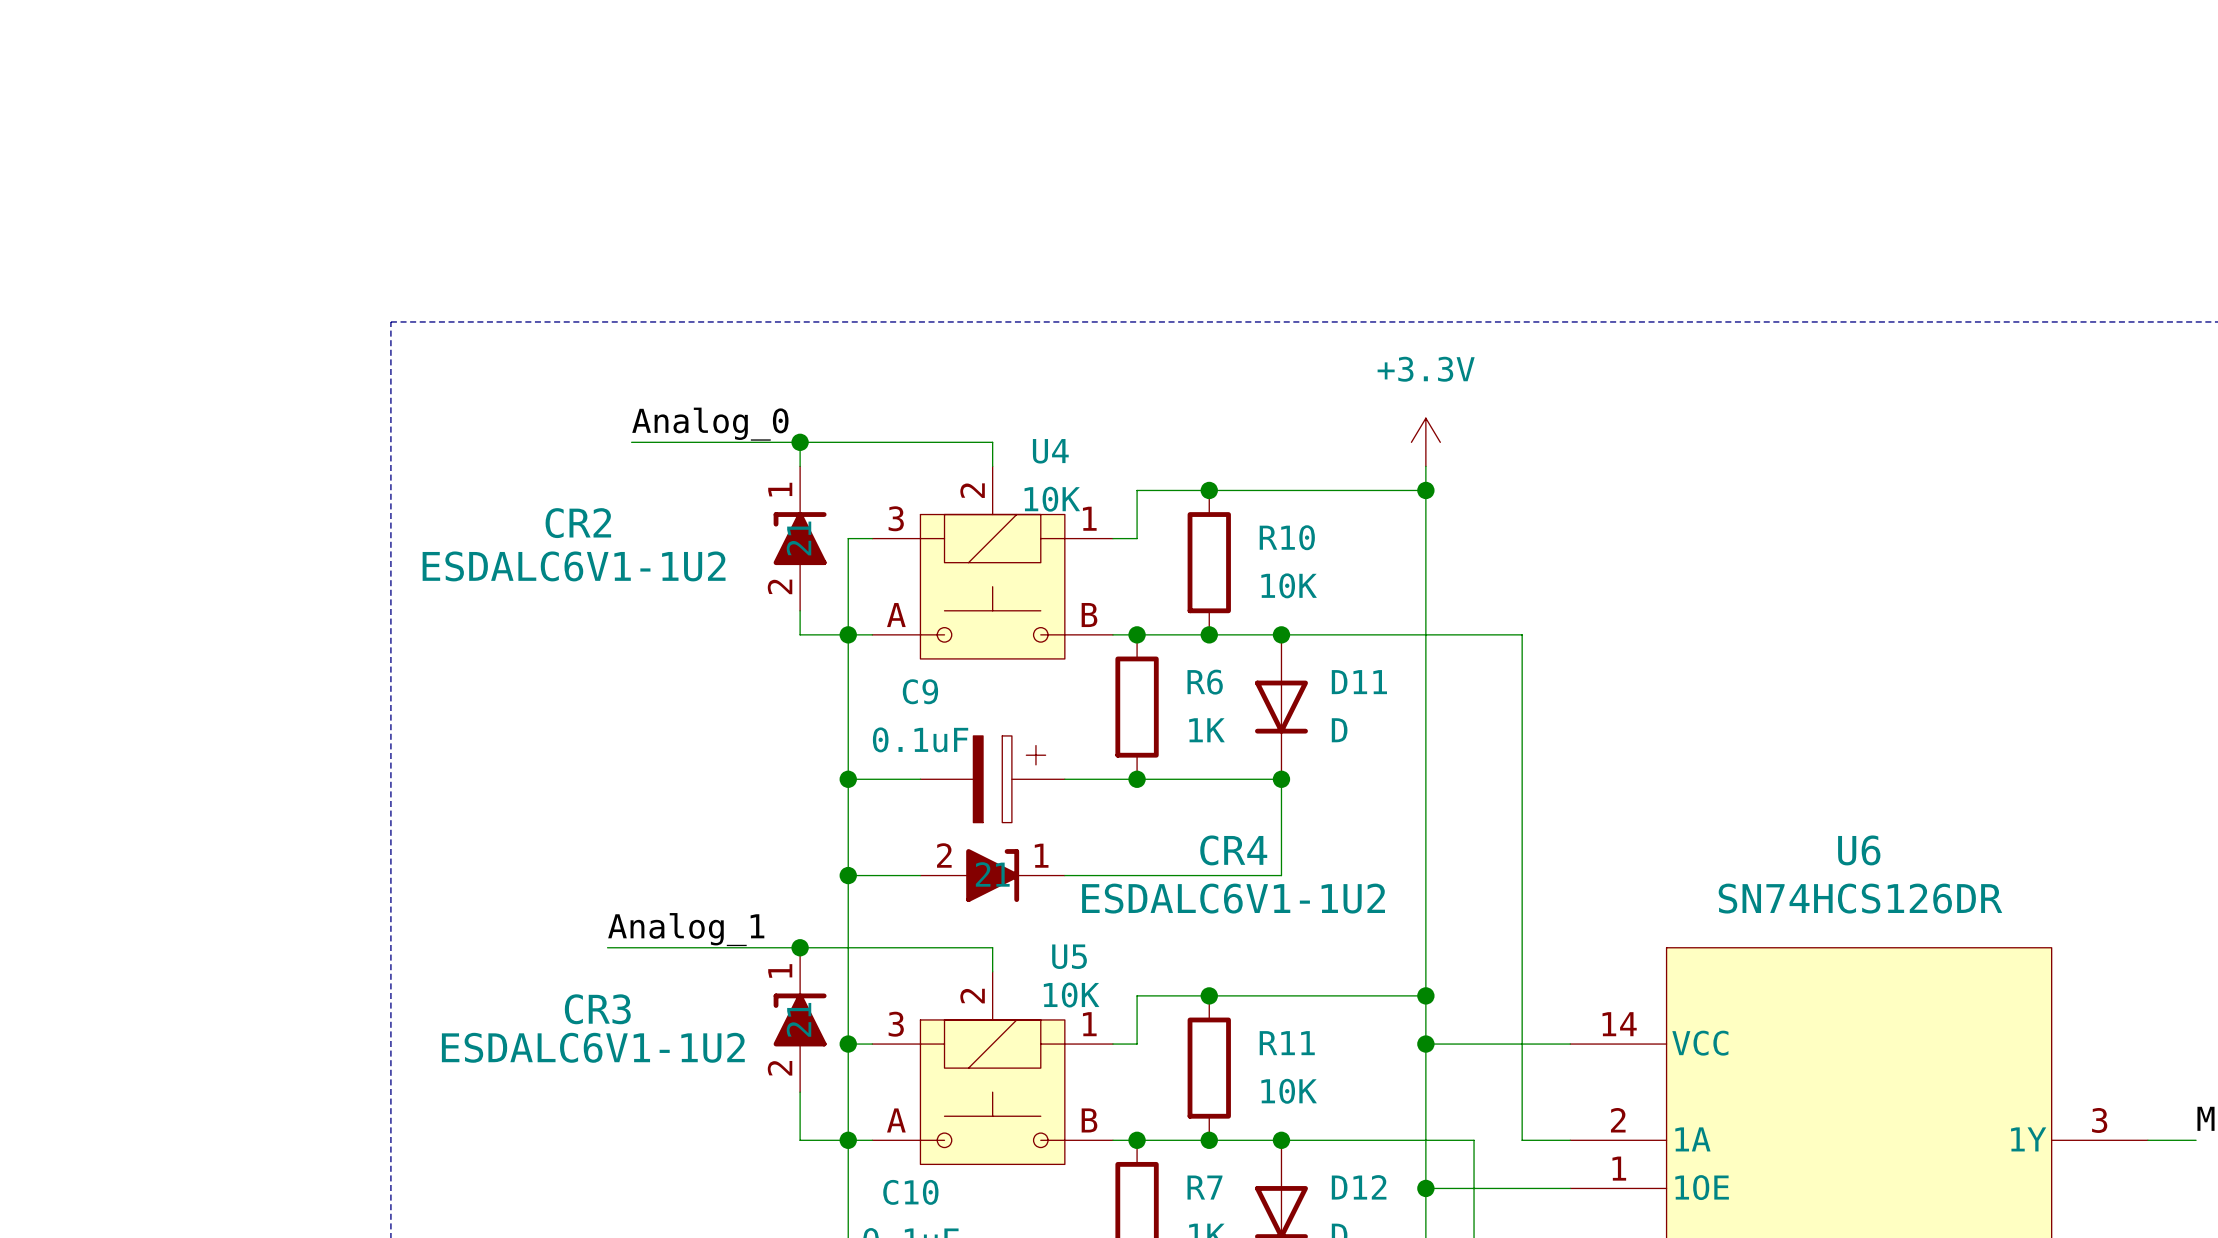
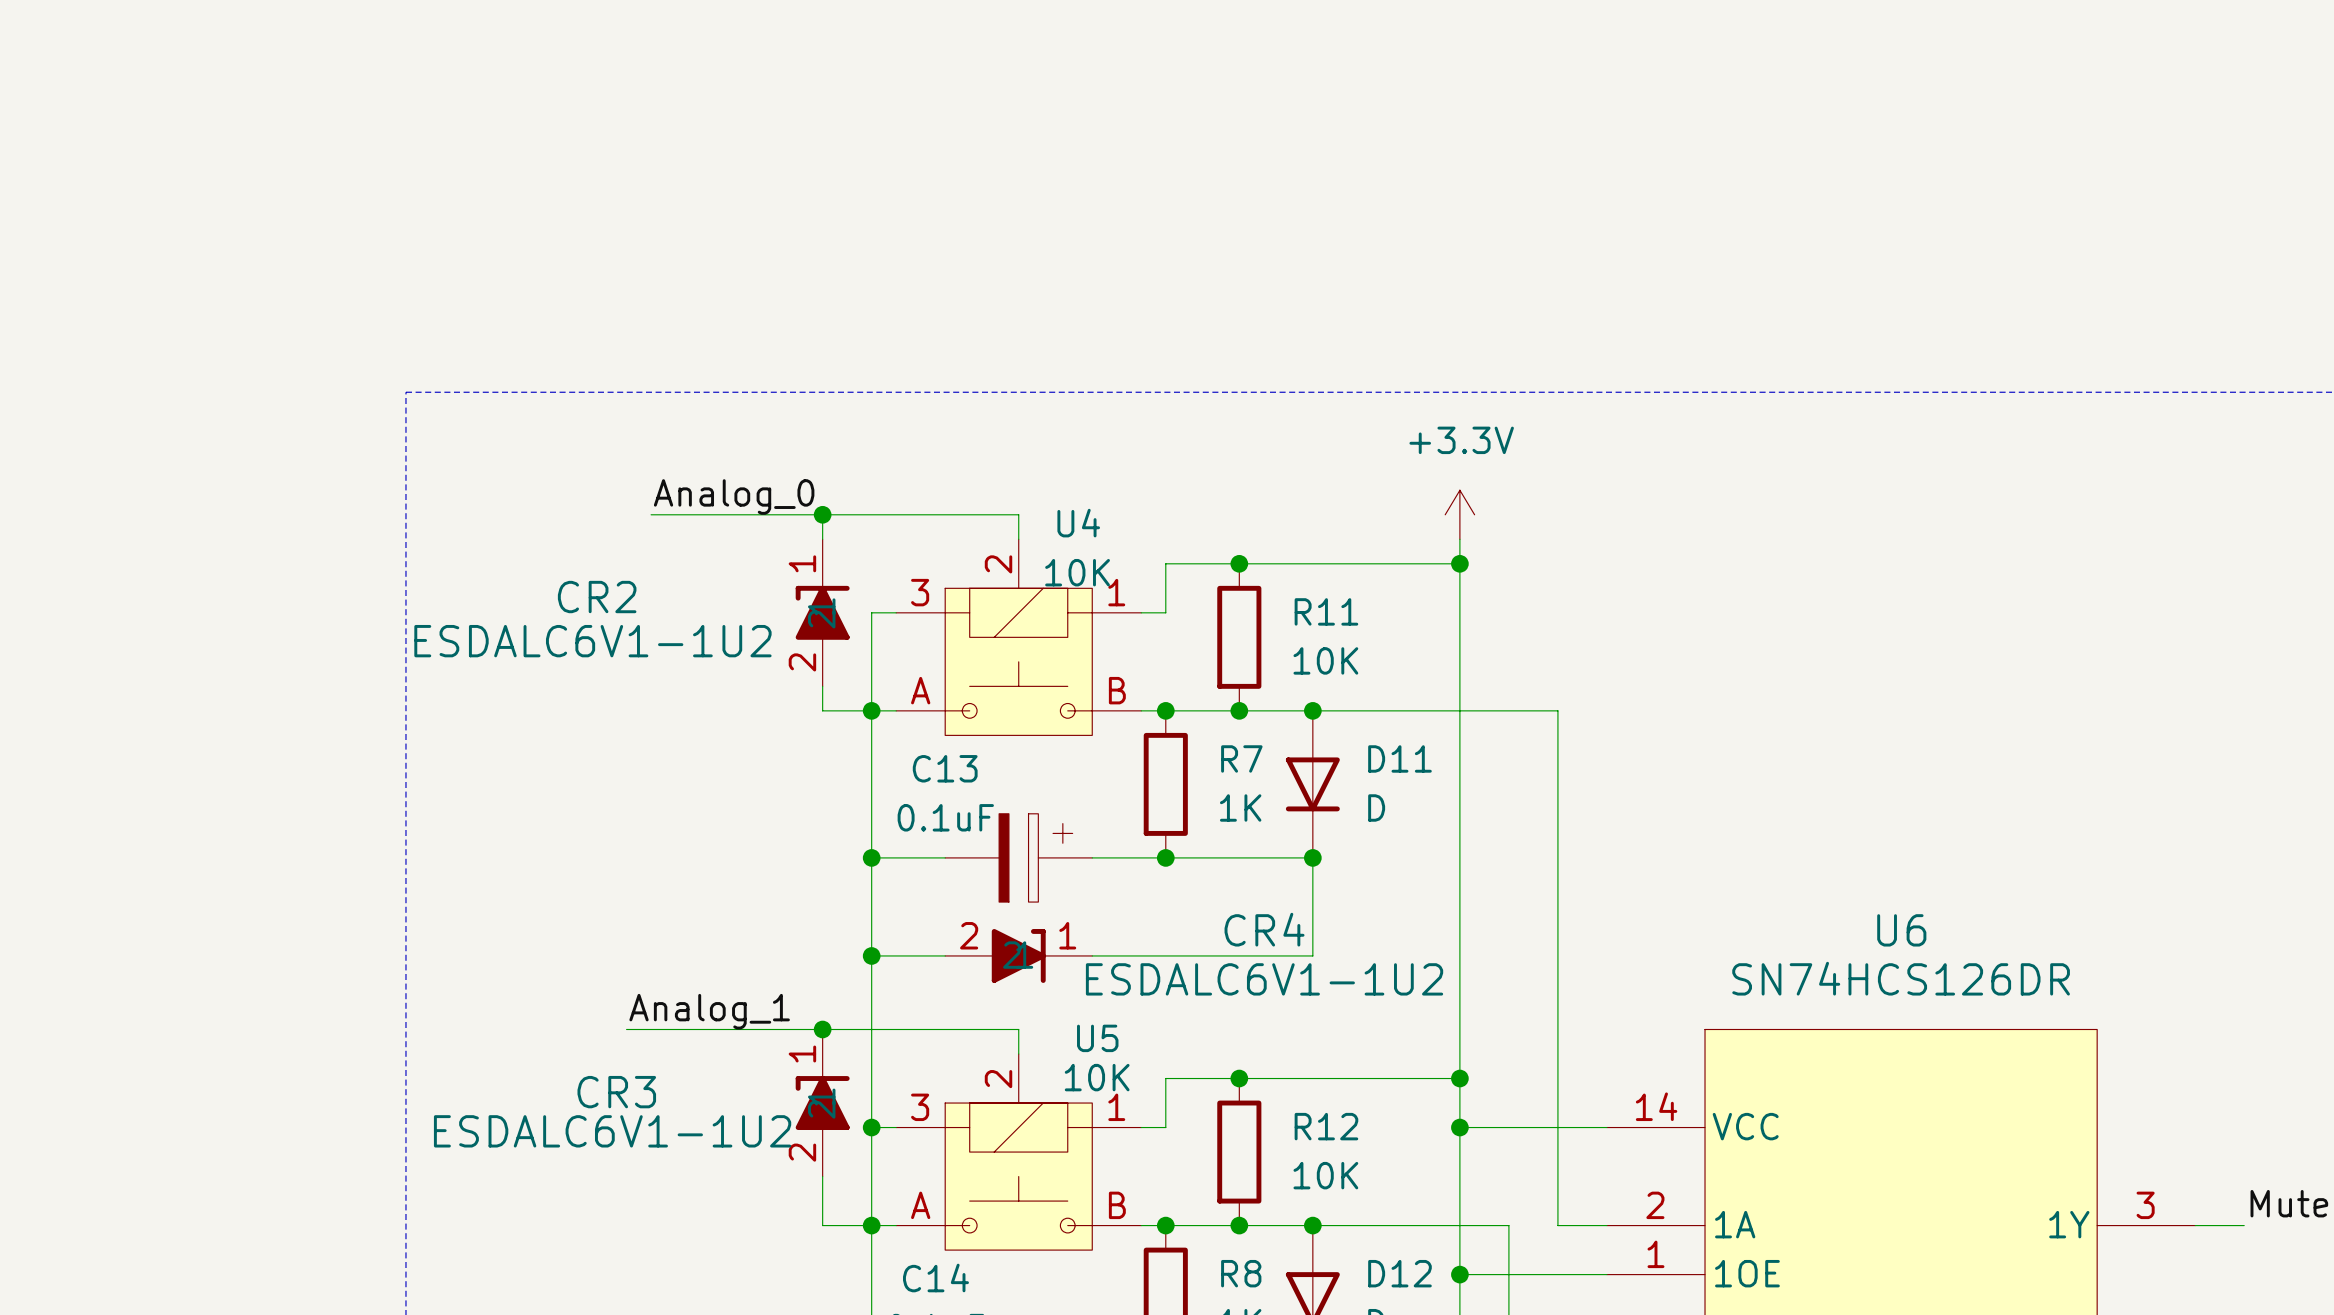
R10 name: R10 (1287, 537) -> R11 (1326, 611)
R6 name: R6 (1205, 682) -> R7 (1241, 758)
C9 name: C9 (920, 691) -> C13 (945, 768)
R11 name: R11 (1287, 1043) -> R12 (1326, 1126)
R7 name: R7 (1204, 1187) -> R8 (1241, 1273)
C10 name: C10 (910, 1192) -> C14 (935, 1278)

